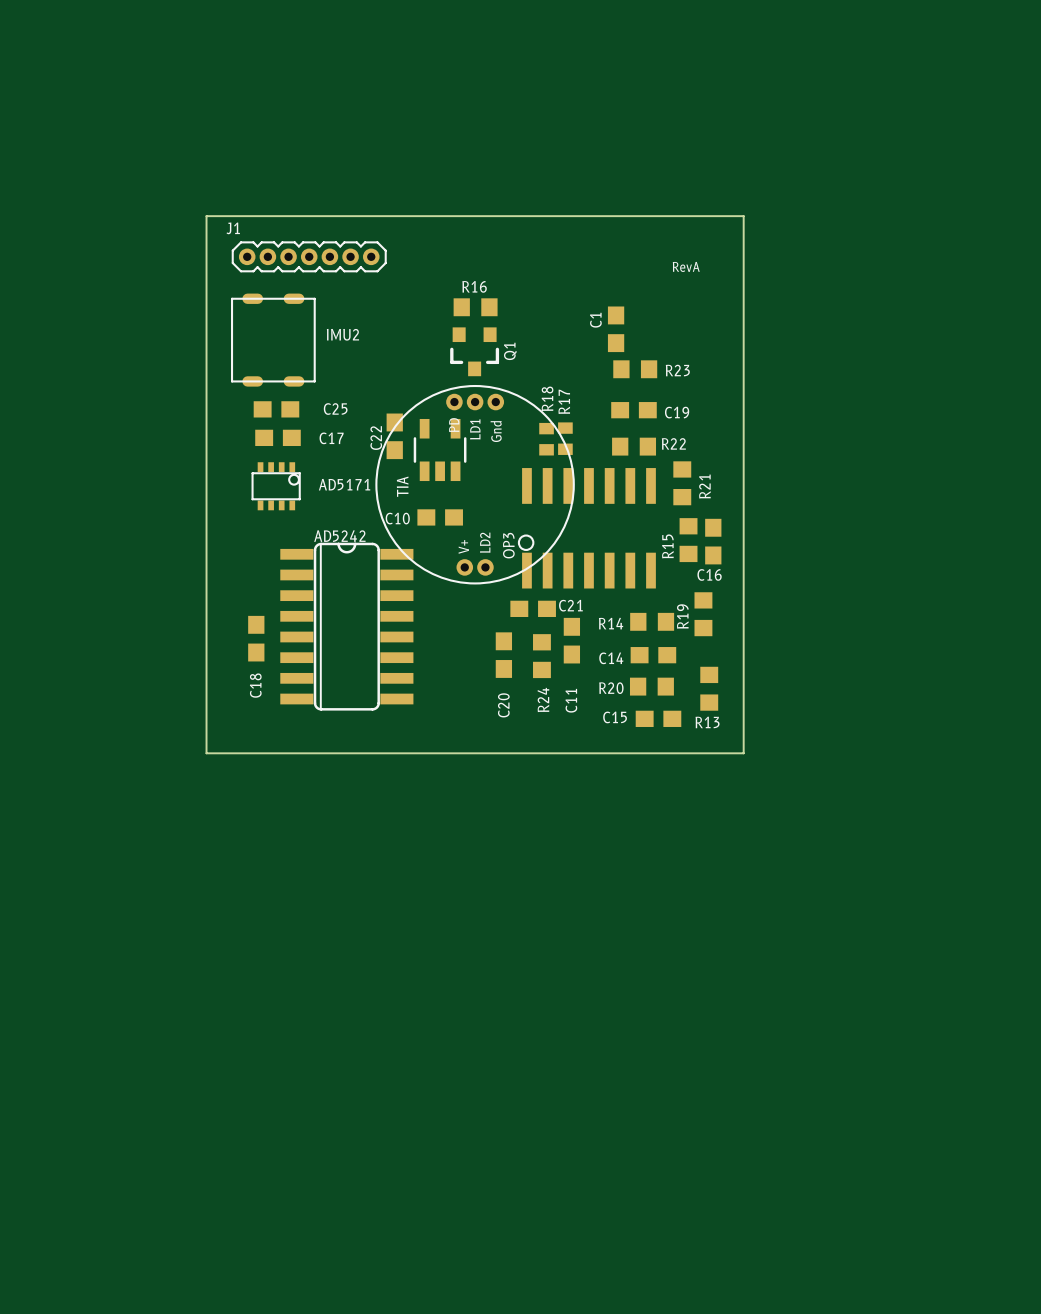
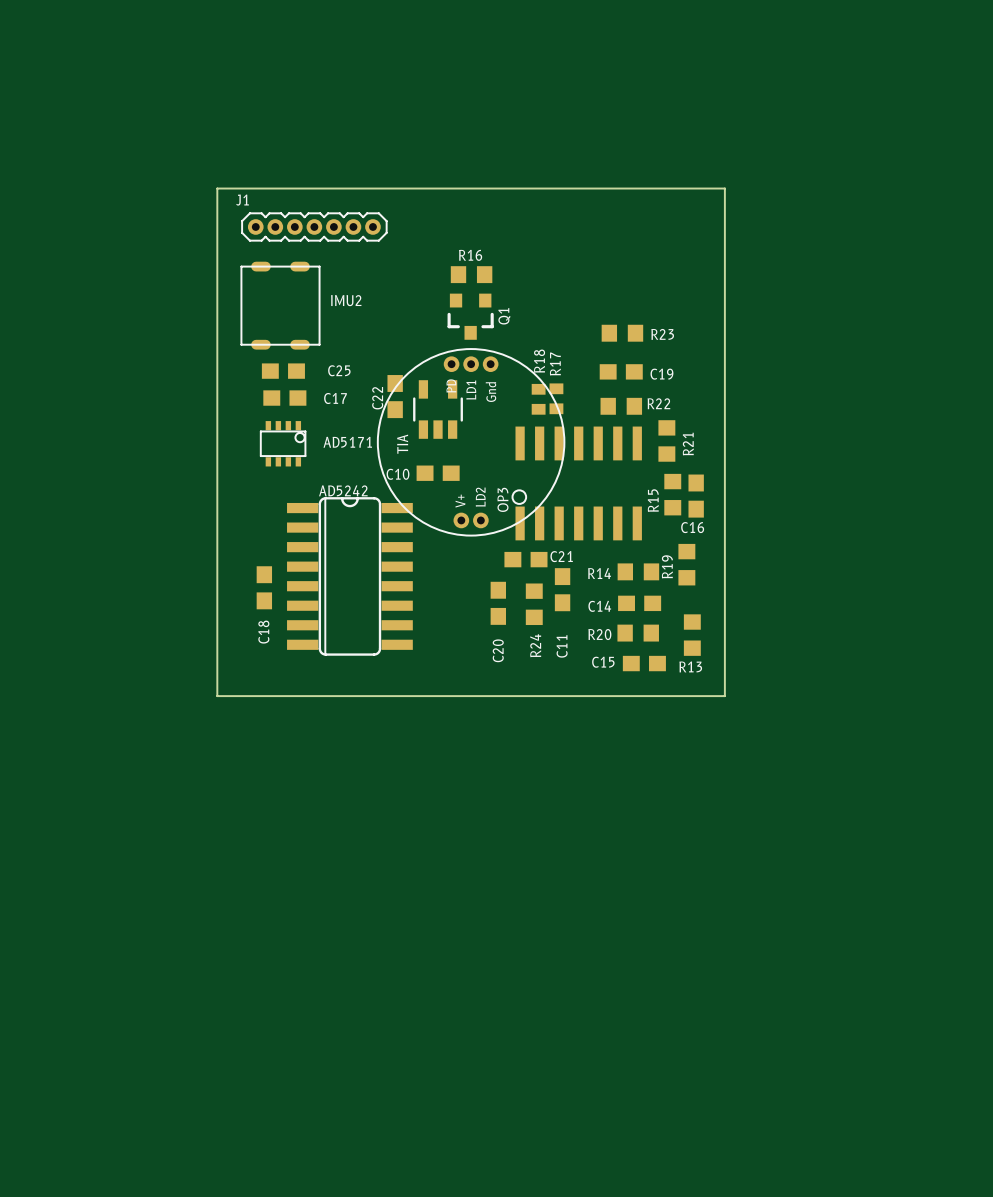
drawing: [672, 261, 700, 272] -> none
C1: (616, 329) -> none

